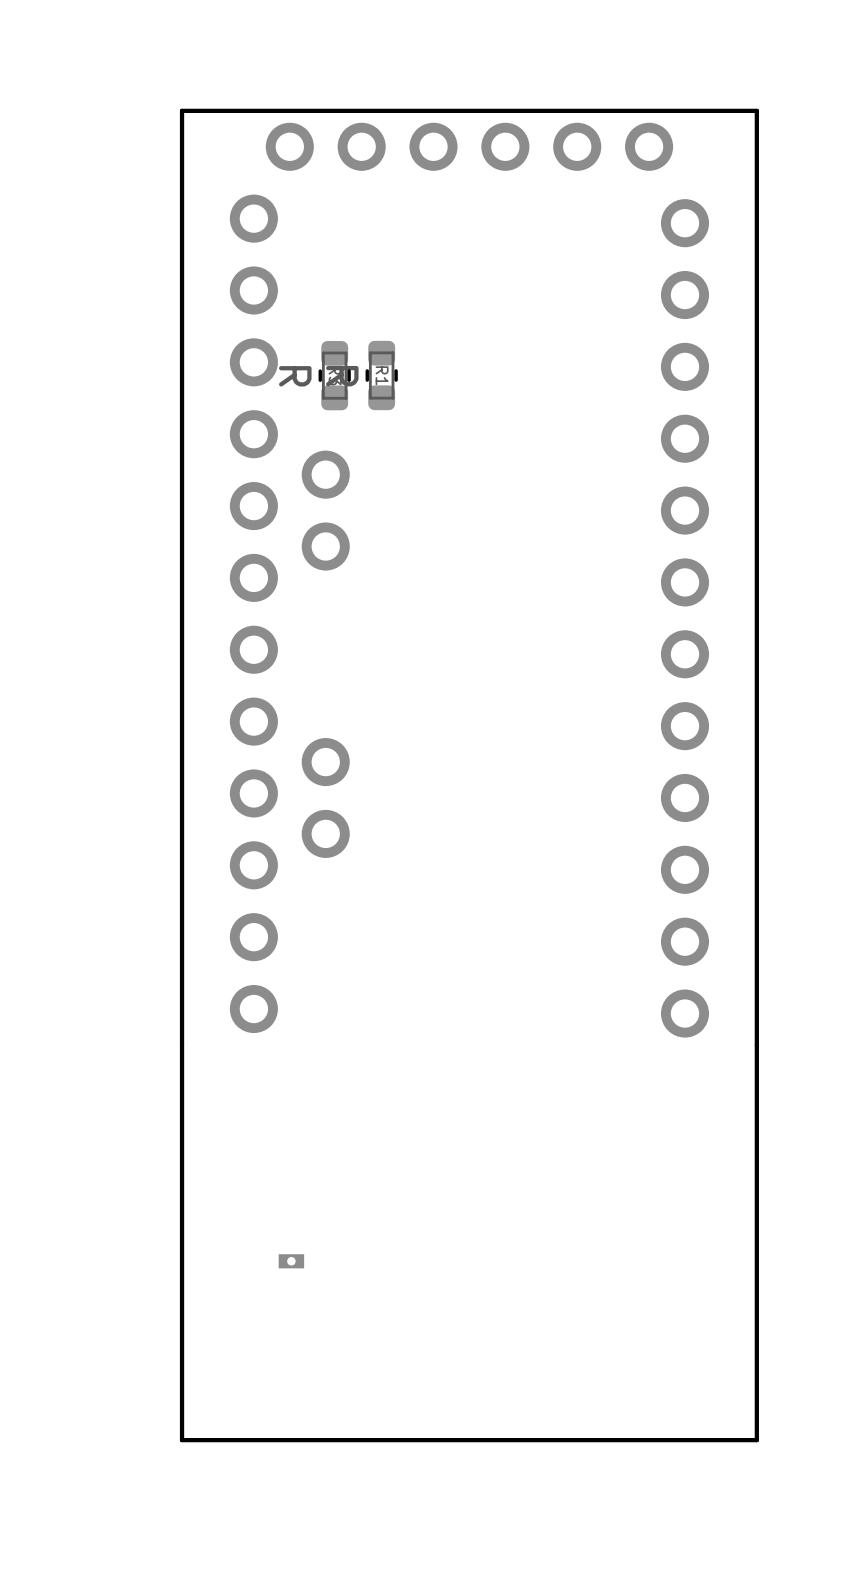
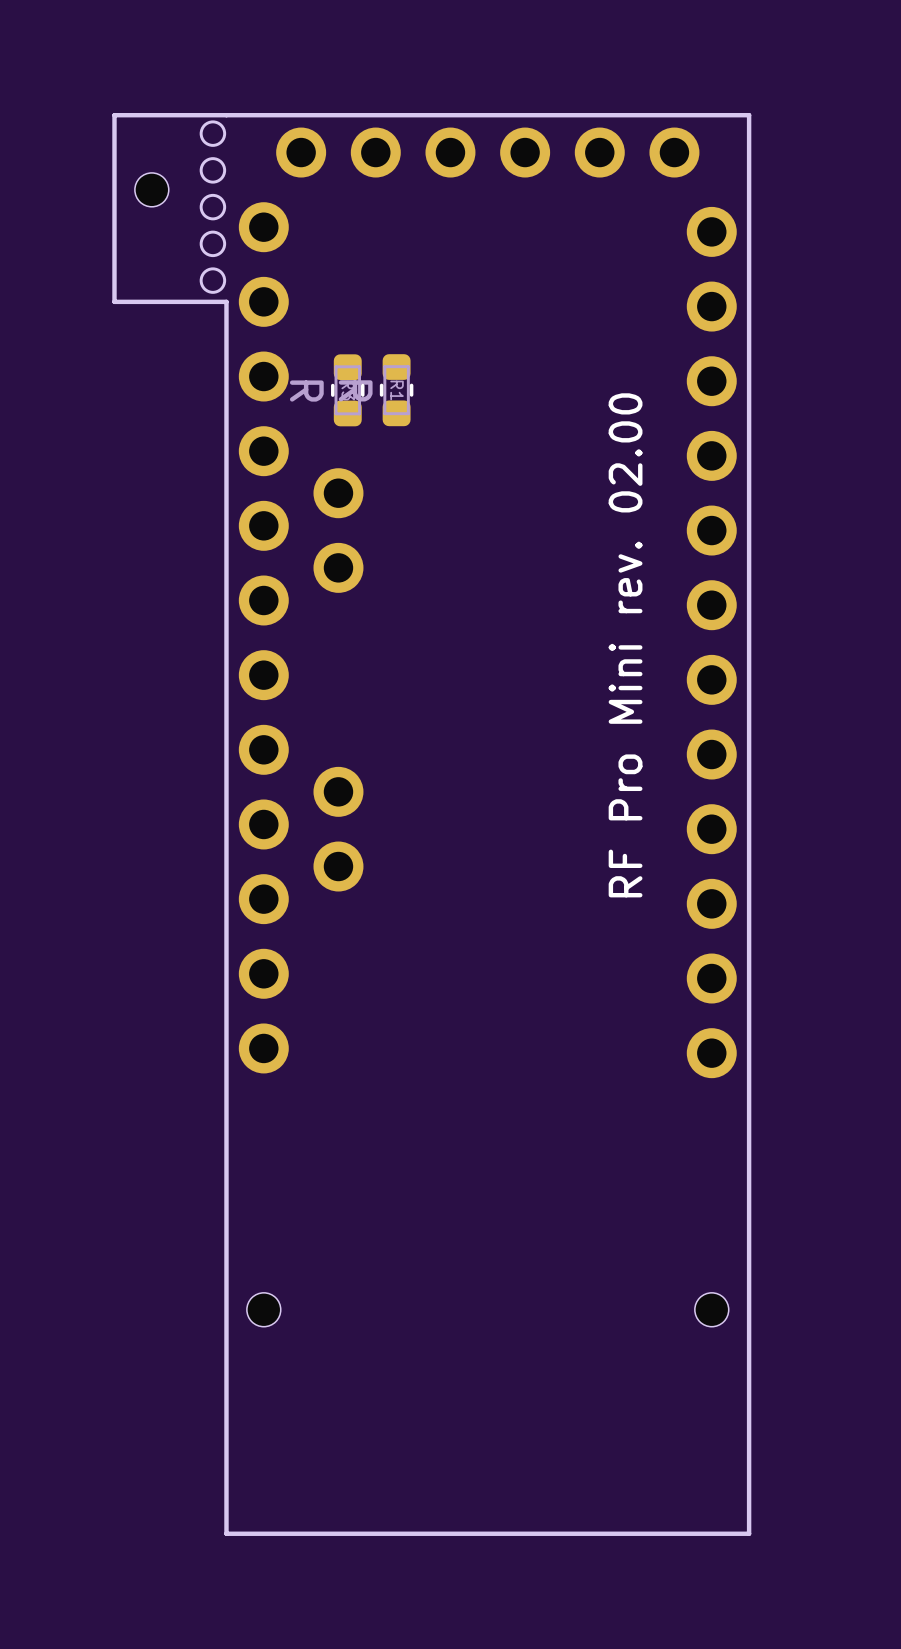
board edge: (720, 110) (756, 110) (756, 1440) (182, 1440) (182, 110) -> (749, 115) (749, 1533) (226, 1533) (226, 301) (114, 301) (114, 115) (189, 115)
round board edge: none -> [199, 120, 227, 147]
round board edge: none -> [199, 157, 227, 184]
part: none -> (151, 189)
round board edge: none -> [199, 193, 227, 221]
round board edge: none -> [199, 230, 227, 258]
round board edge: none -> [199, 267, 227, 294]
text: none -> RF Pro Mini rev. 02.00 (625, 645)
part: none -> (263, 1309)
part: none -> (711, 1309)
part: (291, 1261) -> none

